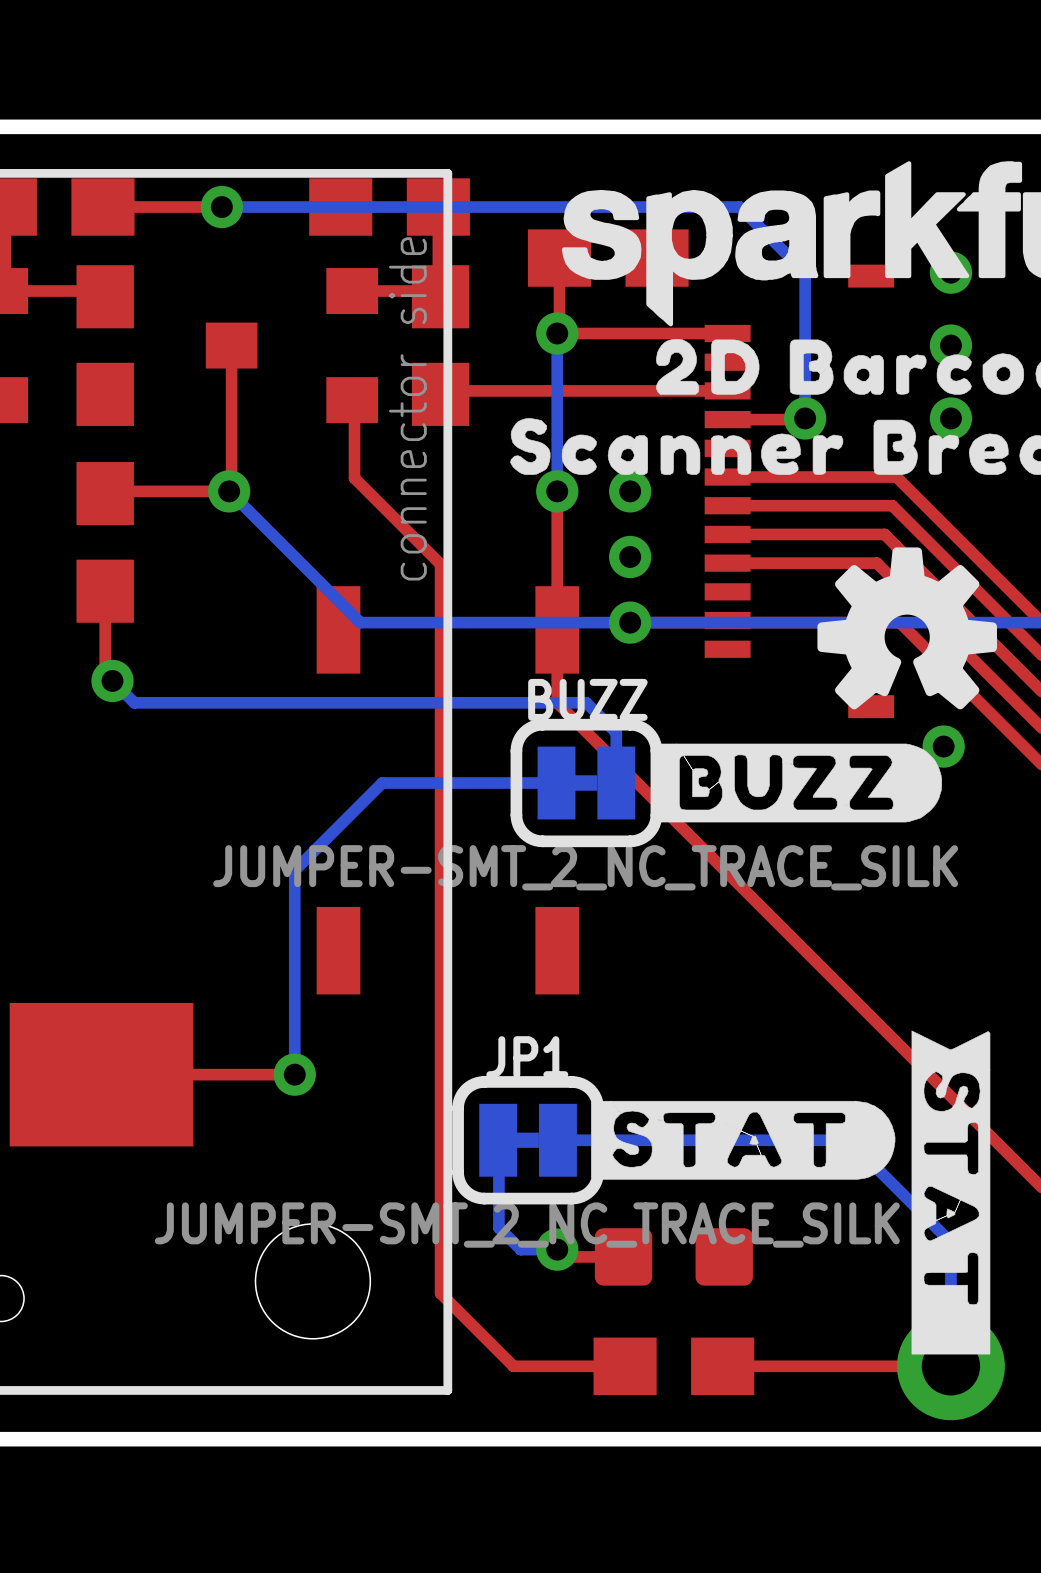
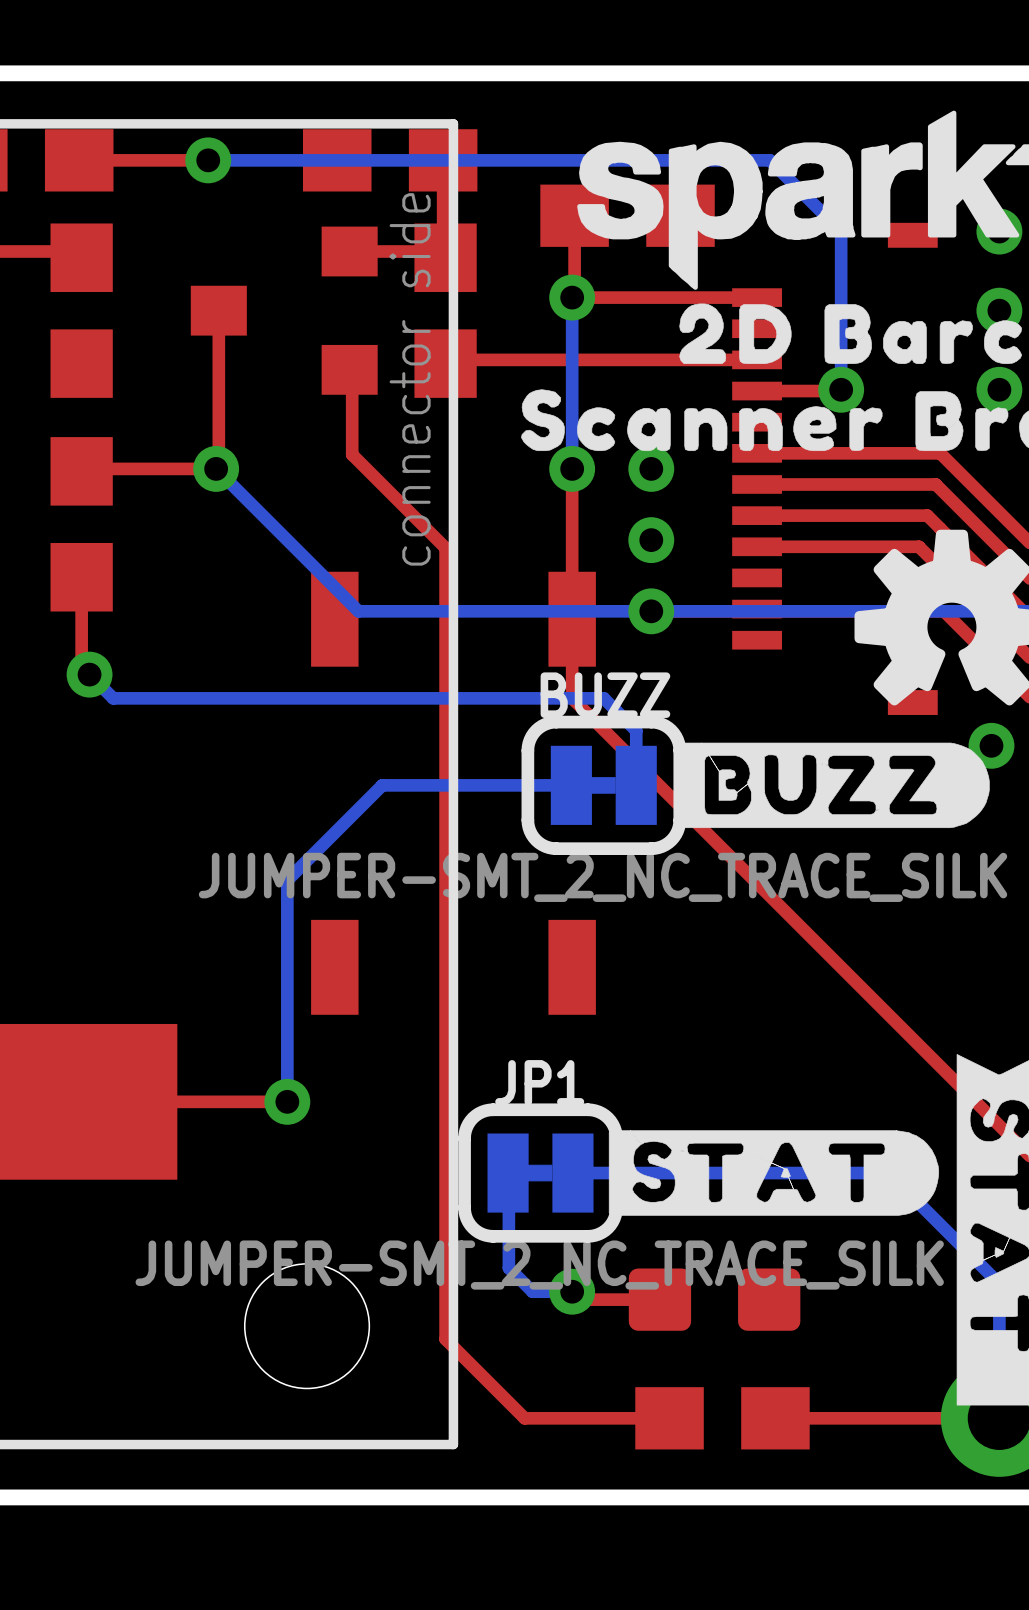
part position: (673, 1256) -> (714, 1299)
part position: (673, 1366) -> (722, 1418)

